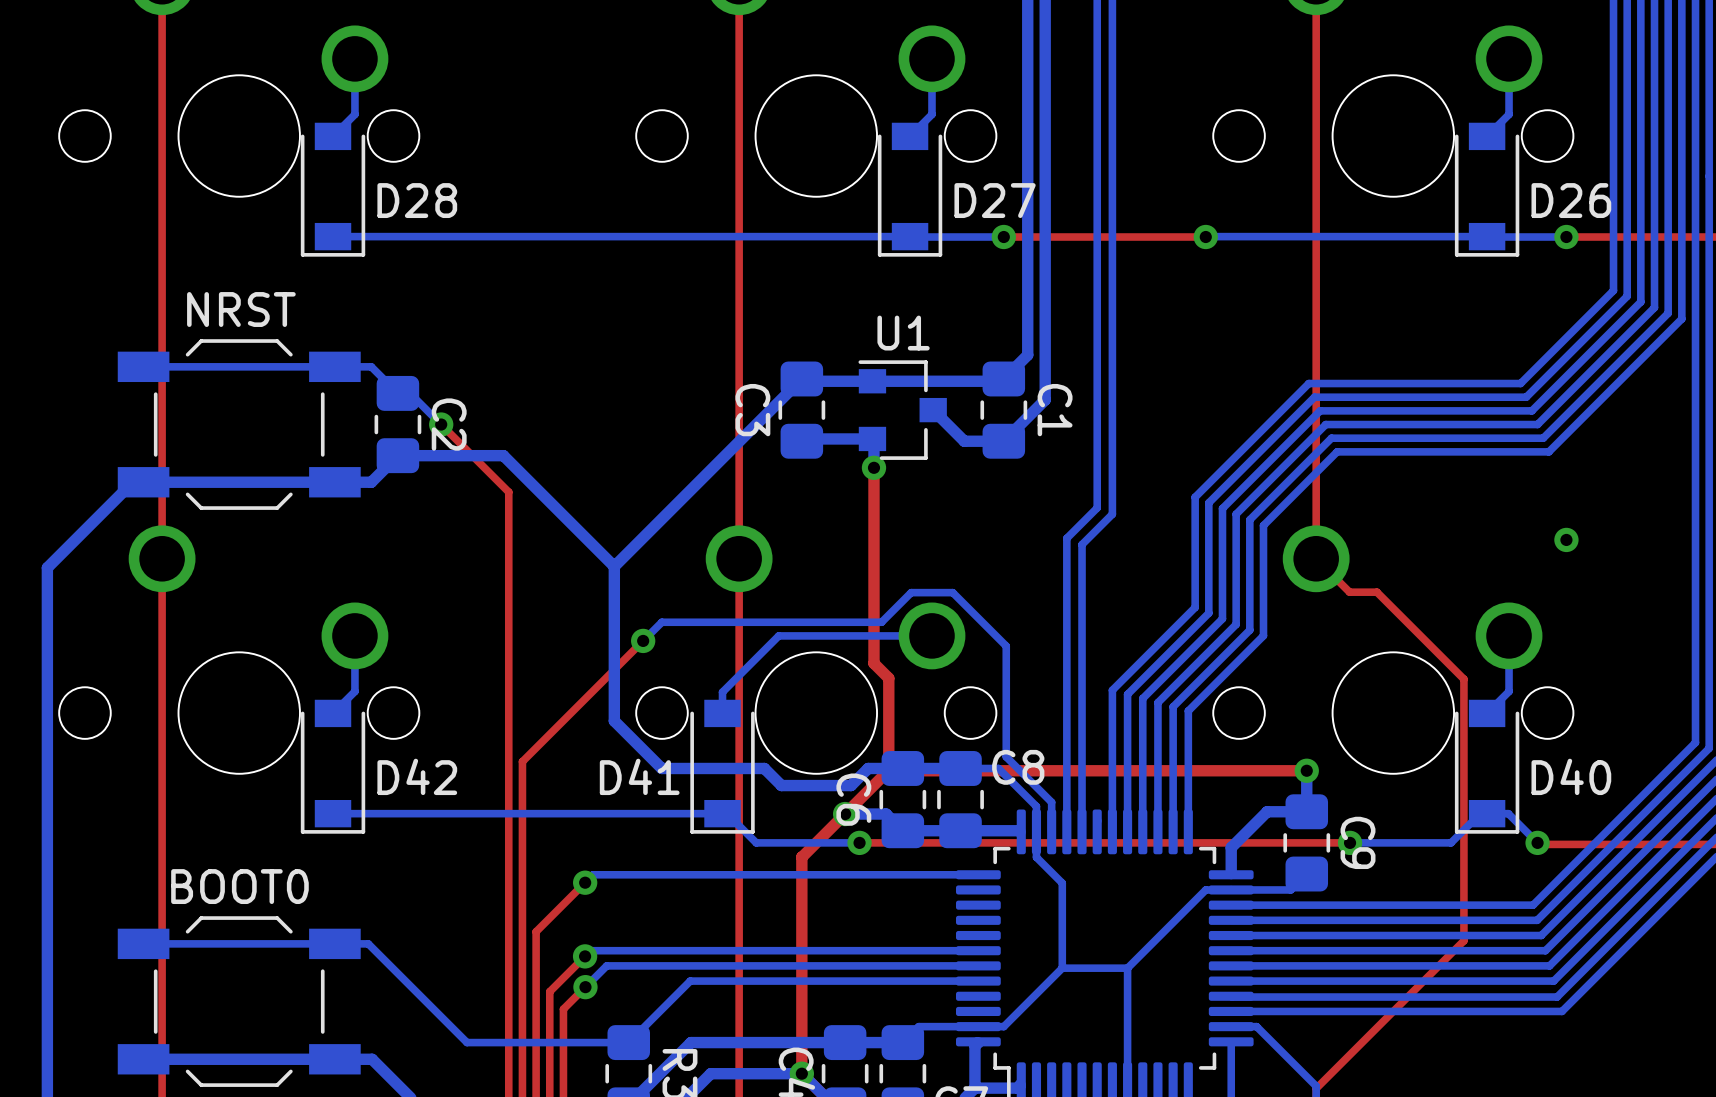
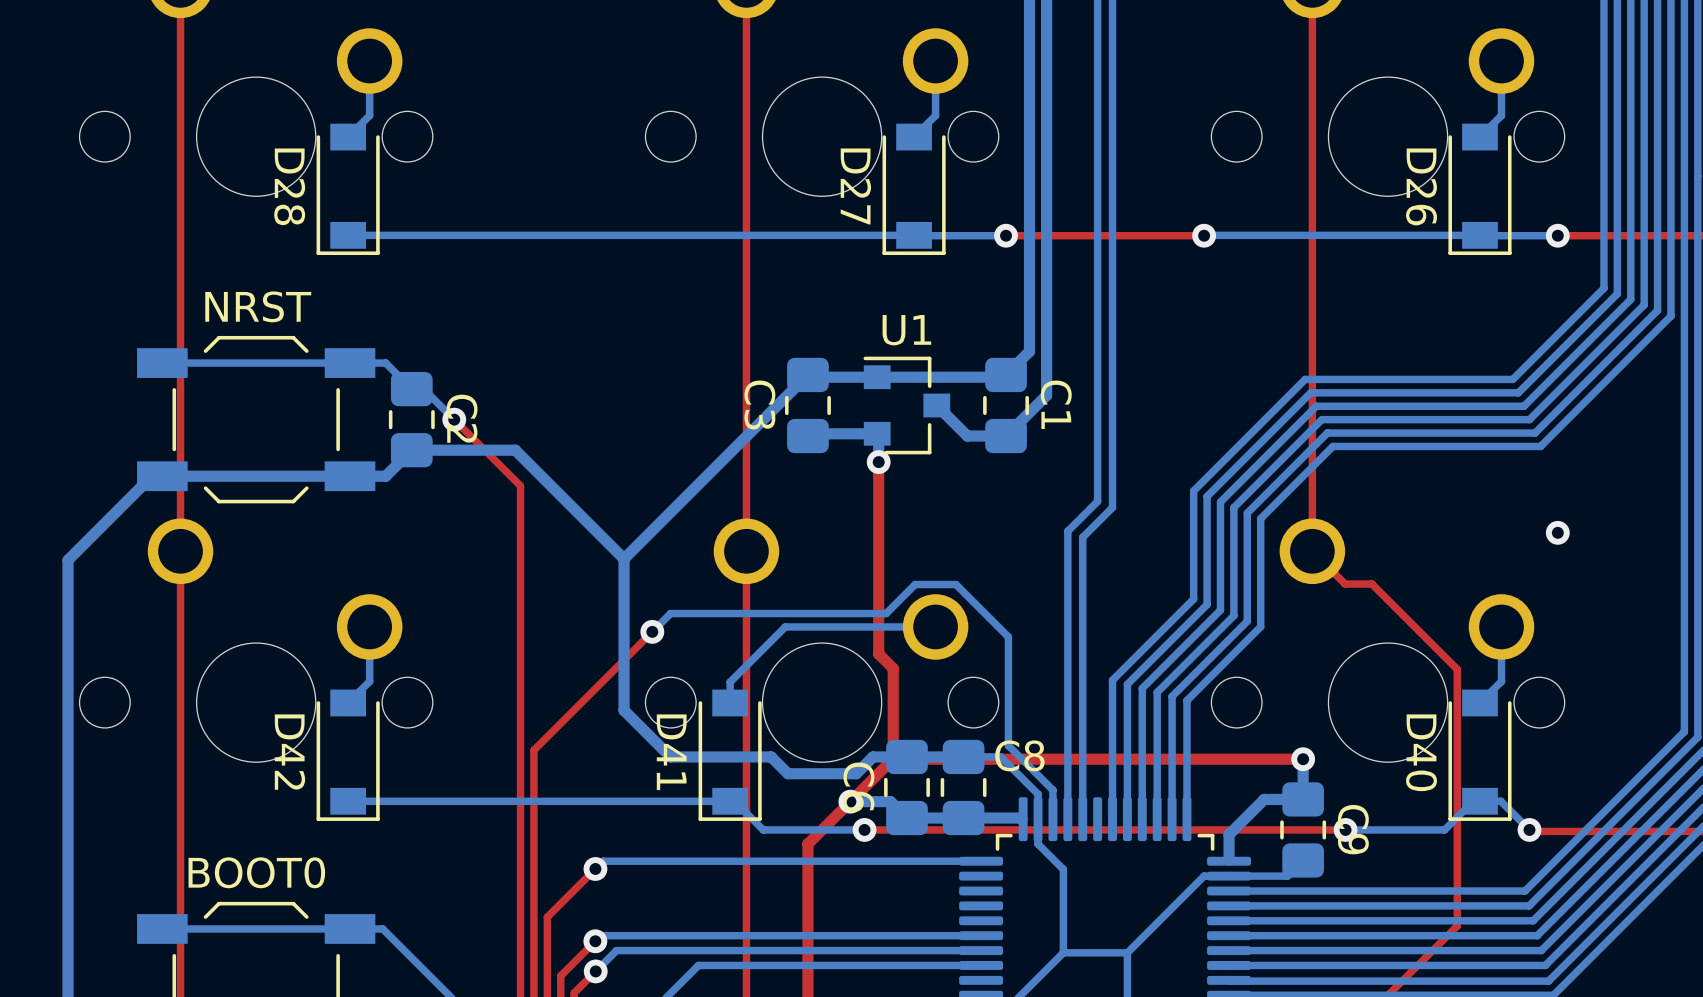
D28 name rotation: 0° (417, 200) -> 90° clockwise (289, 186)
D28 name position: D28 (417, 200) -> D28 (289, 186)
D27 name rotation: 0° (995, 200) -> 90° clockwise (855, 186)
D27 name position: D27 (995, 200) -> D27 (855, 186)
D26 name rotation: 0° (1571, 200) -> 90° clockwise (1421, 186)
D26 name position: D26 (1571, 200) -> D26 (1421, 186)
D42 name rotation: 0° (417, 776) -> 90° clockwise (289, 752)
D42 name position: D42 (417, 776) -> D42 (289, 752)
D41 name rotation: 0° (639, 776) -> 90° clockwise (671, 752)
D40 name rotation: 0° (1571, 776) -> 90° clockwise (1421, 752)
D40 name position: D40 (1571, 776) -> D40 (1421, 752)

